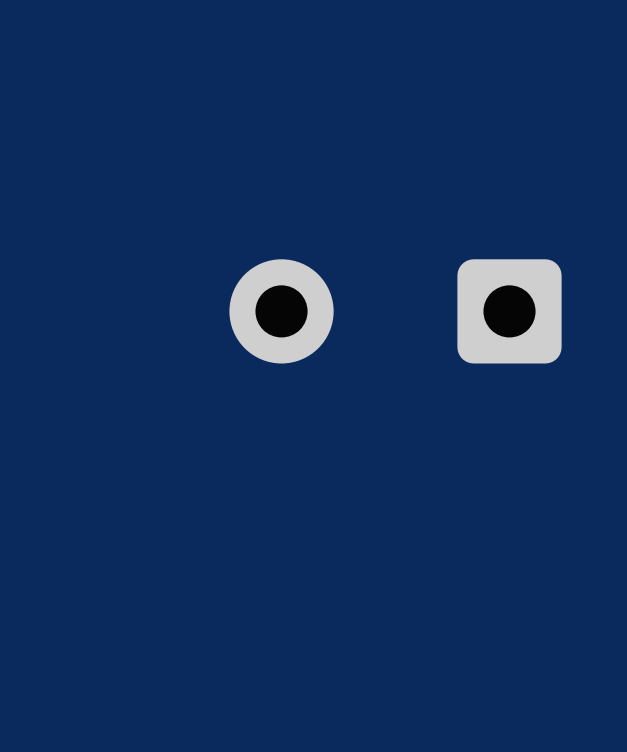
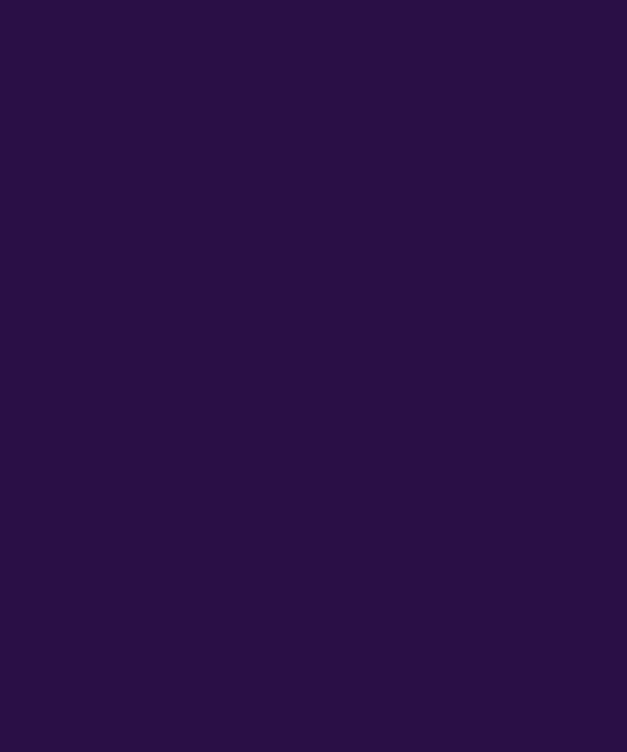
part: (395, 311) -> none

